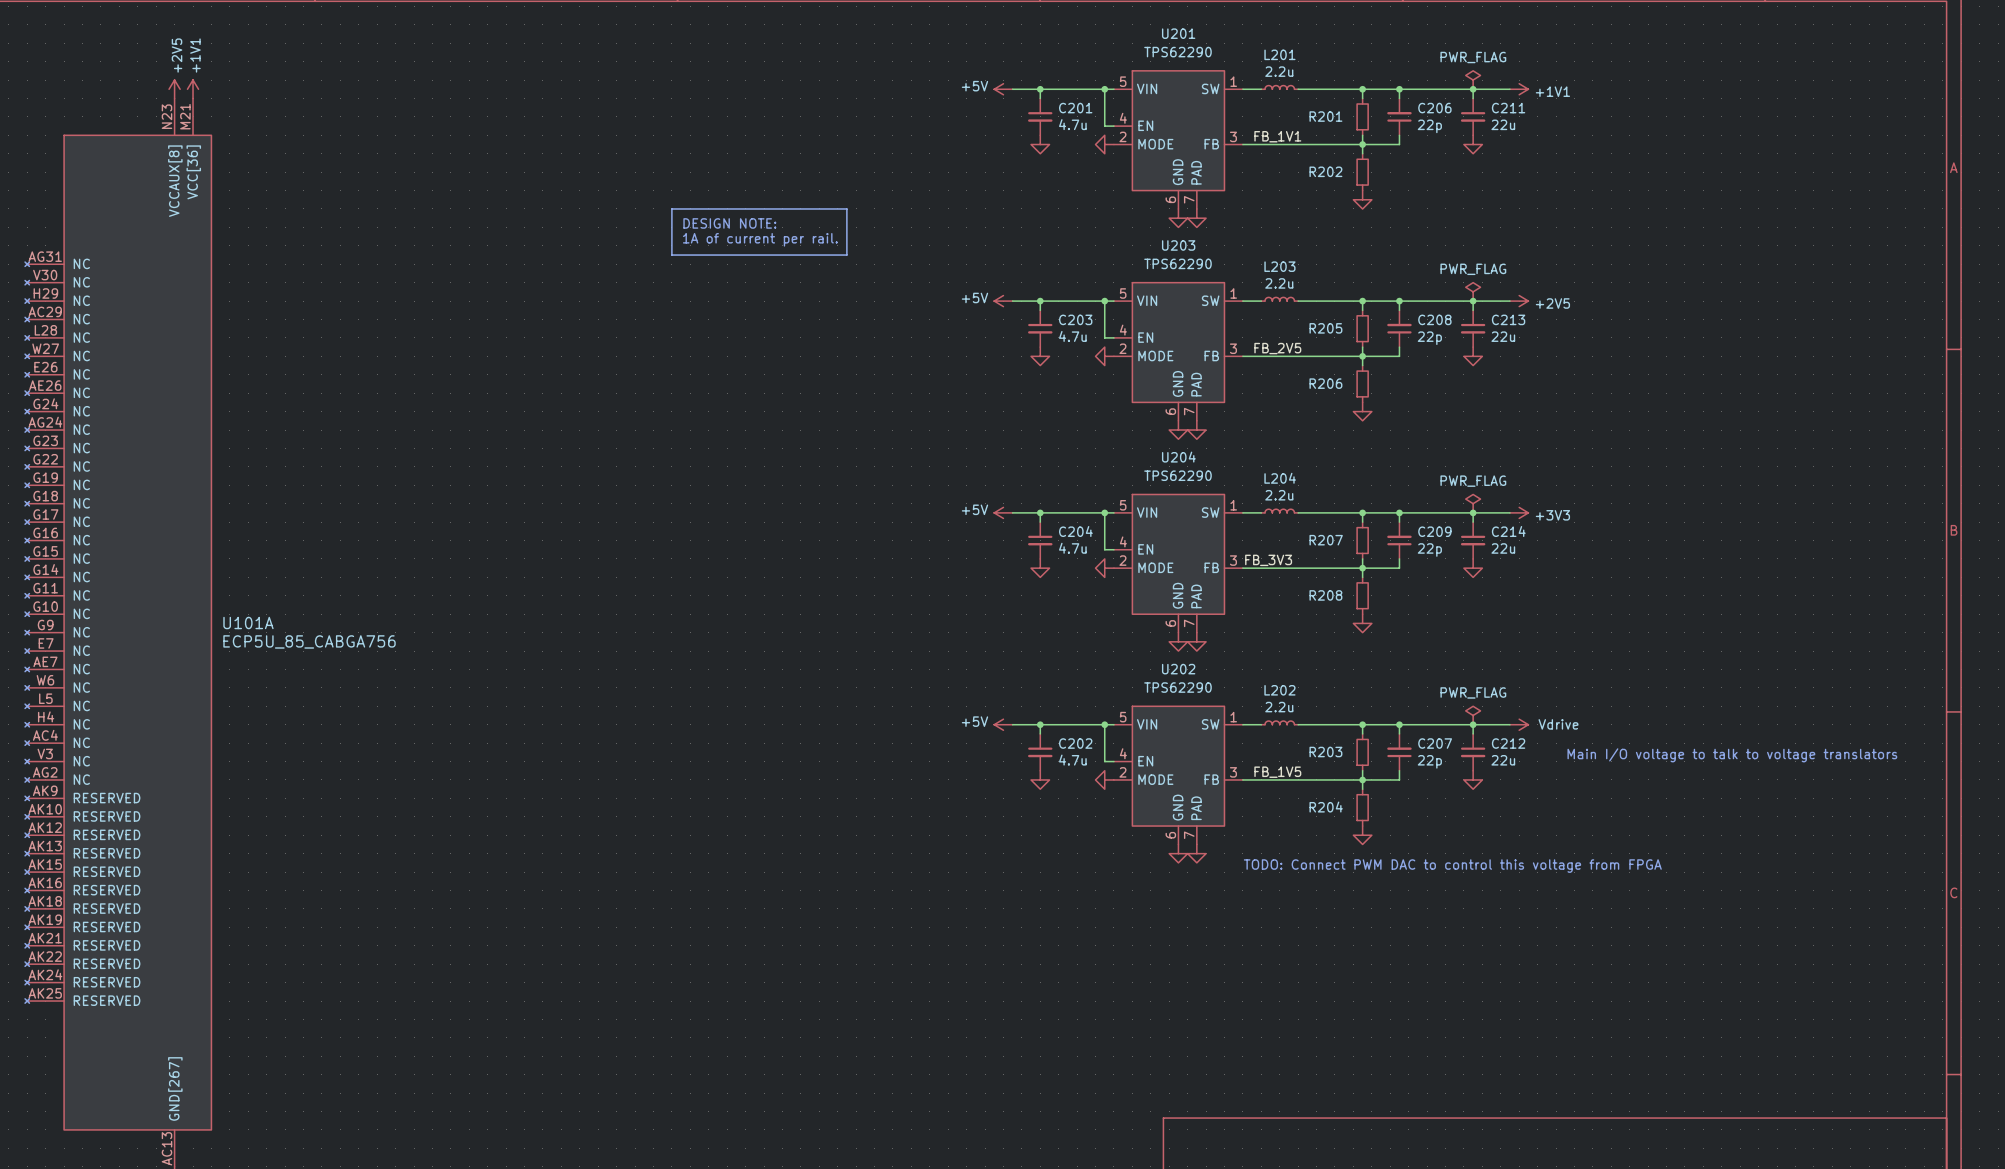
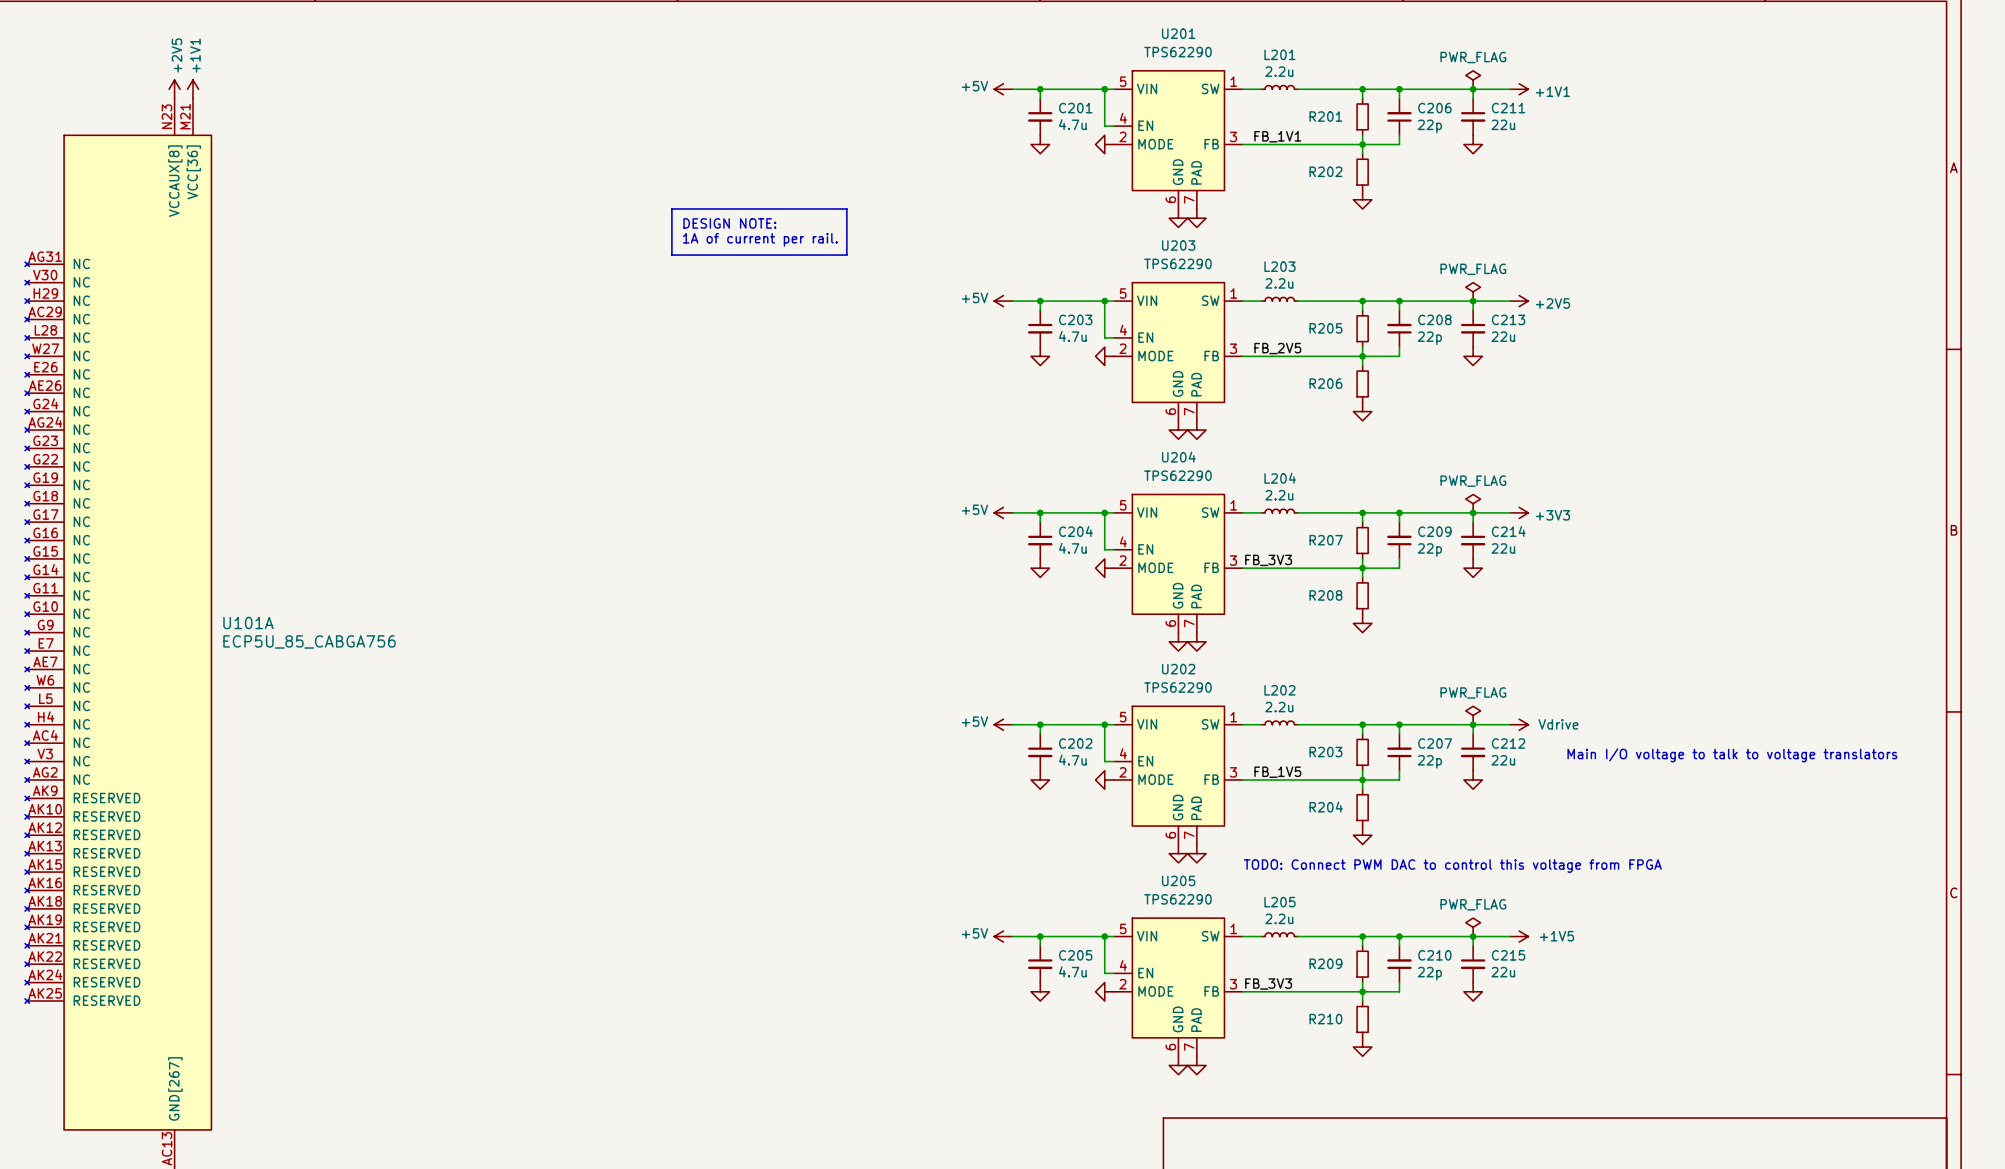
power symbol: none -> PWR_FLAG (1473, 927)
L205: none -> 2.2u (1279, 934)
power symbol: none -> +5V (1003, 936)
wire: none -> (1012, 936) (1113, 936)
wire: none -> (1040, 936) (1040, 945)
junction: none -> (1040, 936)
wire: none -> (1104, 936) (1104, 973) (1113, 973)
junction: none -> (1104, 936)
wire: none -> (1242, 936) (1261, 936)
wire: none -> (1298, 936) (1509, 936)
wire: none -> (1362, 936) (1362, 945)
junction: none -> (1362, 936)
wire: none -> (1399, 936) (1399, 945)
junction: none -> (1399, 936)
wire: none -> (1473, 936) (1473, 945)
junction: none -> (1473, 936)
power symbol: none -> +1V5 (1519, 936)
C205: none -> 4.7u (1040, 964)
R209: none -> (1362, 964)
C210: none -> 22p (1399, 964)
C215: none -> 22u (1473, 964)
wire: none -> (1362, 982) (1362, 1001)
wire: none -> (1399, 982) (1399, 991) (1242, 991)
label: none -> FB_3V3 (1268, 984)
U205: none -> TPS62290 (1178, 987)
power symbol: none -> (1040, 991)
power symbol: none -> (1104, 991)
junction: none -> (1362, 991)
power symbol: none -> (1473, 991)
R210: none -> (1362, 1019)
power symbol: none -> (1362, 1047)
power symbol: none -> (1178, 1065)
power symbol: none -> (1196, 1065)

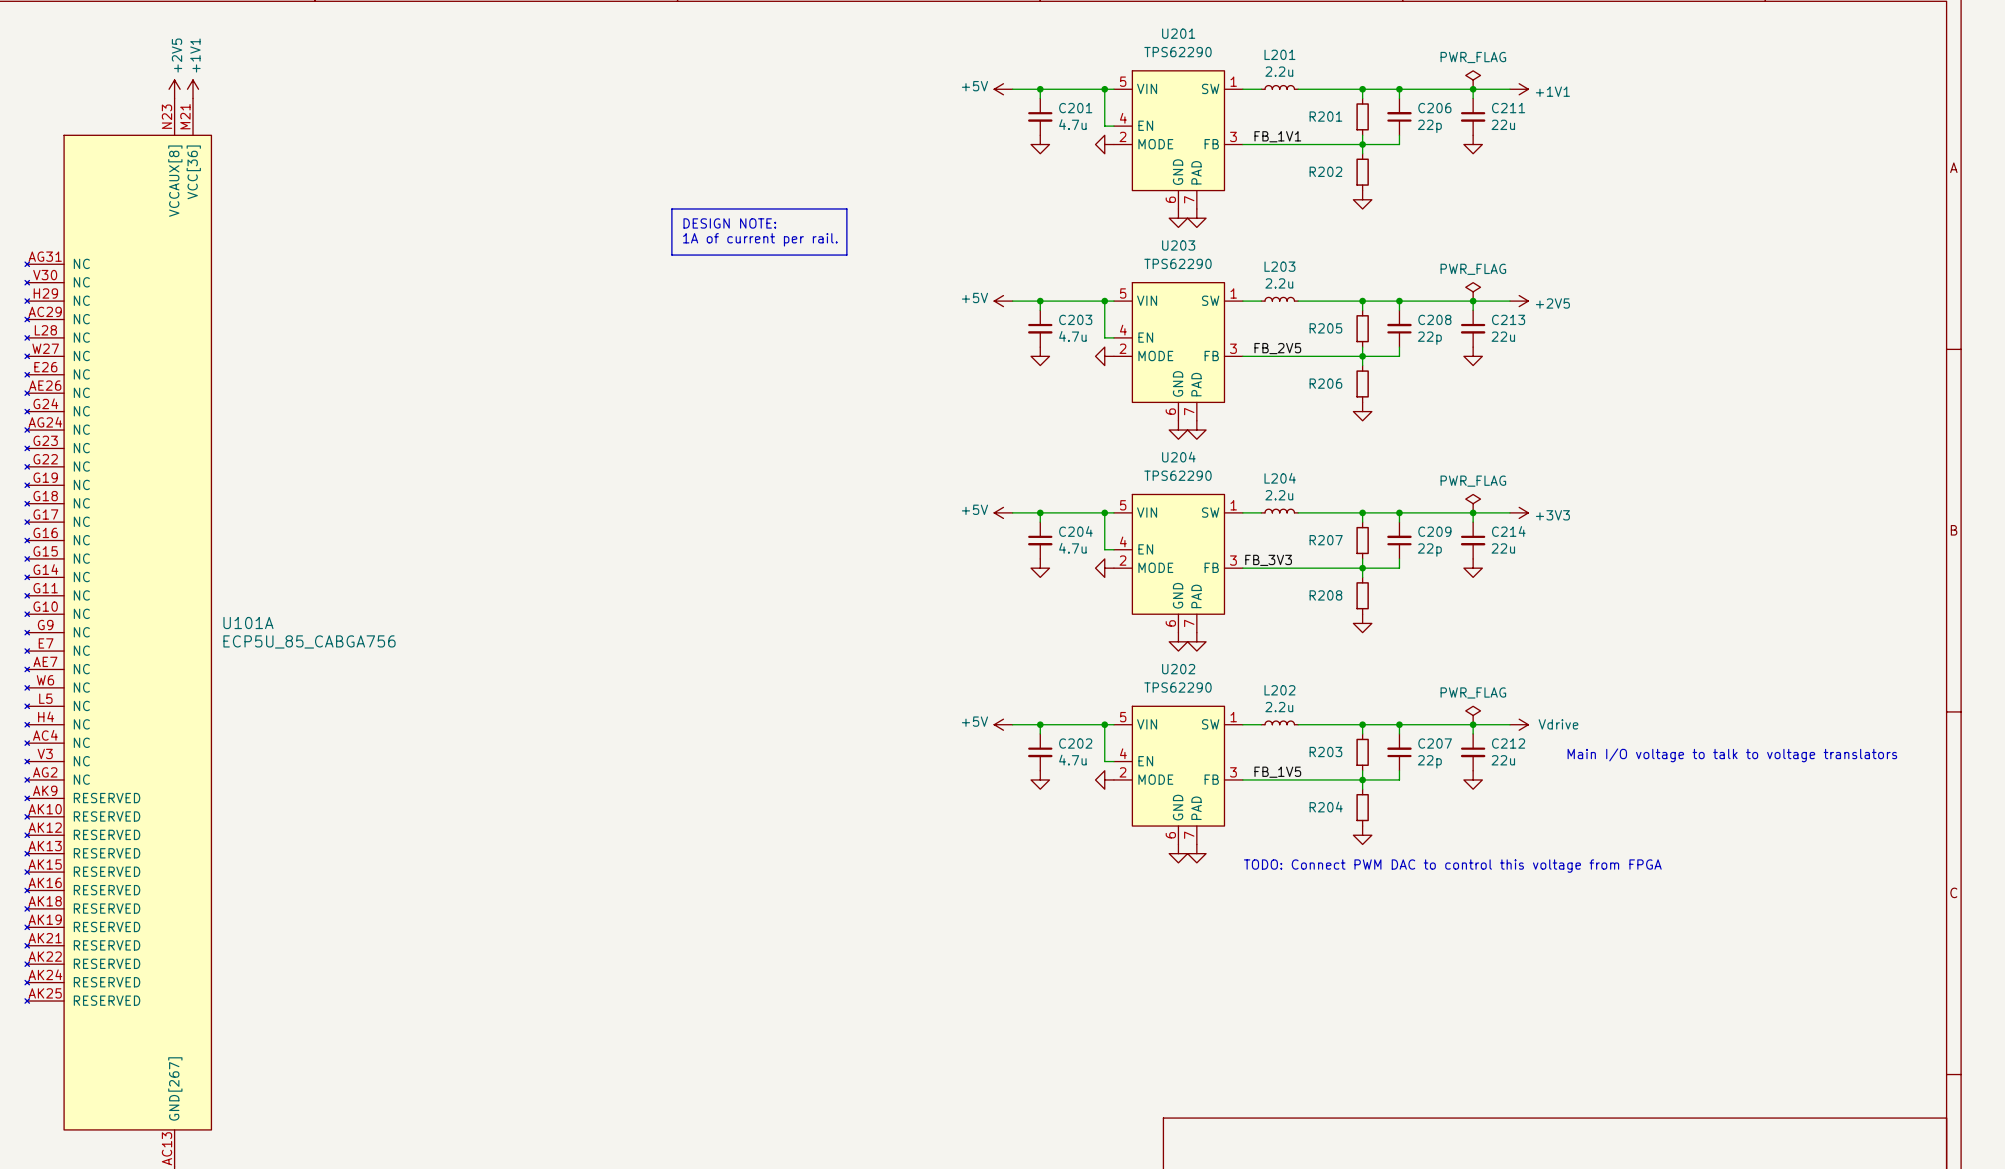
power symbol: PWR_FLAG (1473, 927) -> none
L205: 2.2u (1279, 934) -> none
power symbol: +5V (1003, 936) -> none
wire: (1012, 936) (1113, 936) -> none
wire: (1040, 936) (1040, 945) -> none
junction: (1040, 936) -> none
wire: (1104, 936) (1104, 973) (1113, 973) -> none
junction: (1104, 936) -> none
wire: (1242, 936) (1261, 936) -> none
wire: (1298, 936) (1509, 936) -> none
wire: (1362, 936) (1362, 945) -> none
junction: (1362, 936) -> none
wire: (1399, 936) (1399, 945) -> none
junction: (1399, 936) -> none
wire: (1473, 936) (1473, 945) -> none
junction: (1473, 936) -> none
power symbol: +1V5 (1519, 936) -> none
C205: 4.7u (1040, 964) -> none
R209: (1362, 964) -> none
C210: 22p (1399, 964) -> none
C215: 22u (1473, 964) -> none
wire: (1362, 982) (1362, 1001) -> none
wire: (1399, 982) (1399, 991) (1242, 991) -> none
label: FB_3V3 (1268, 984) -> none
U205: TPS62290 (1178, 987) -> none
power symbol: (1040, 991) -> none
power symbol: (1104, 991) -> none
junction: (1362, 991) -> none
power symbol: (1473, 991) -> none
R210: (1362, 1019) -> none
power symbol: (1362, 1047) -> none
power symbol: (1178, 1065) -> none
power symbol: (1196, 1065) -> none

